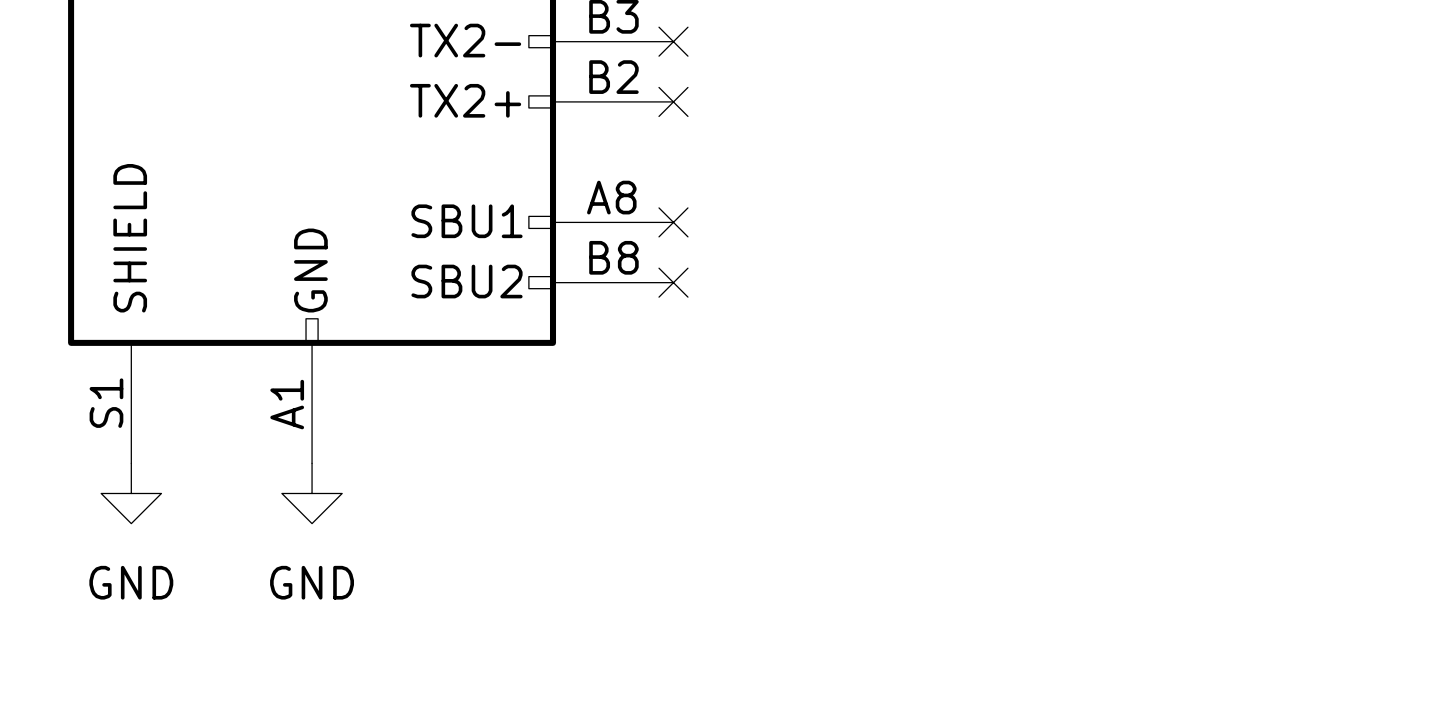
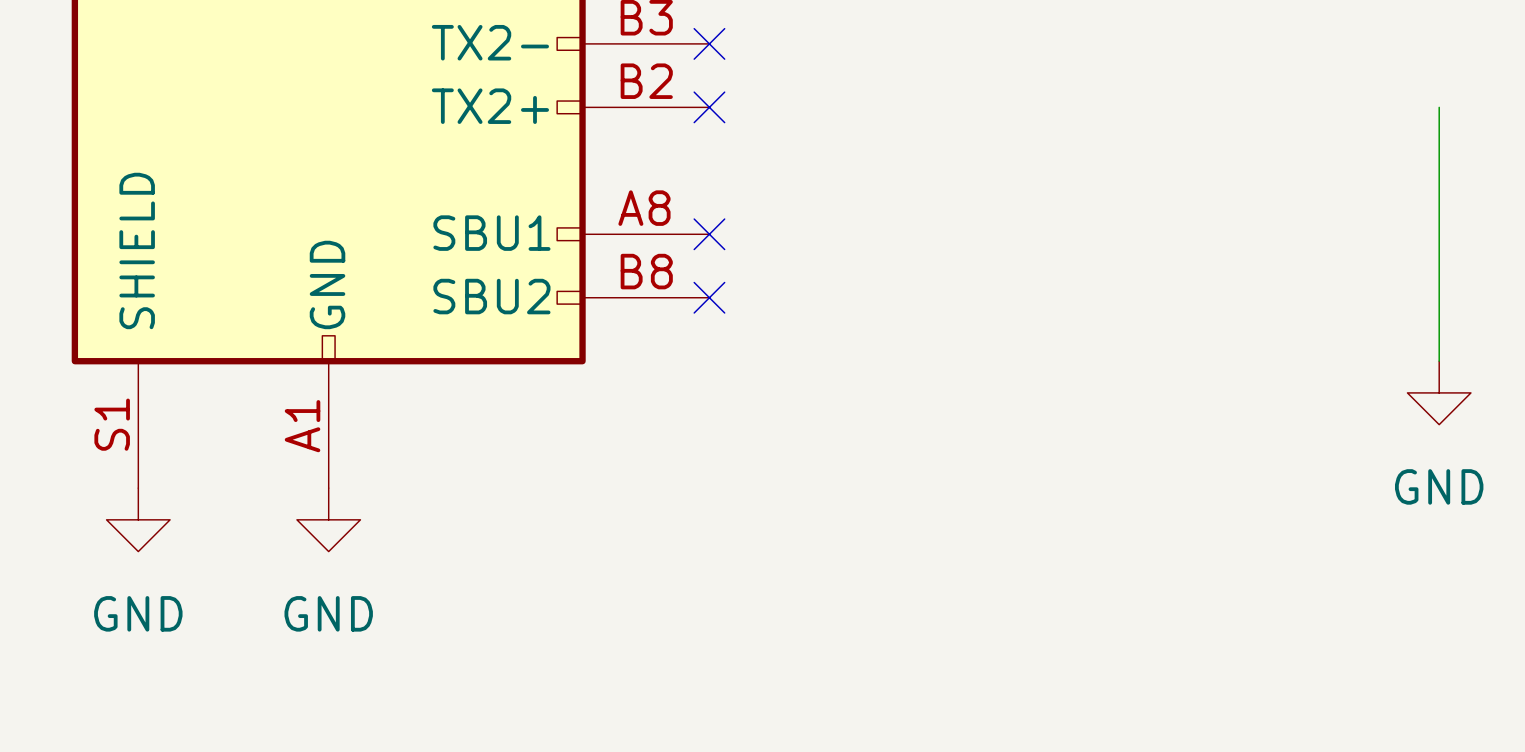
wire: none -> (1439, 107) (1439, 361)
power symbol: none -> GND (1439, 392)

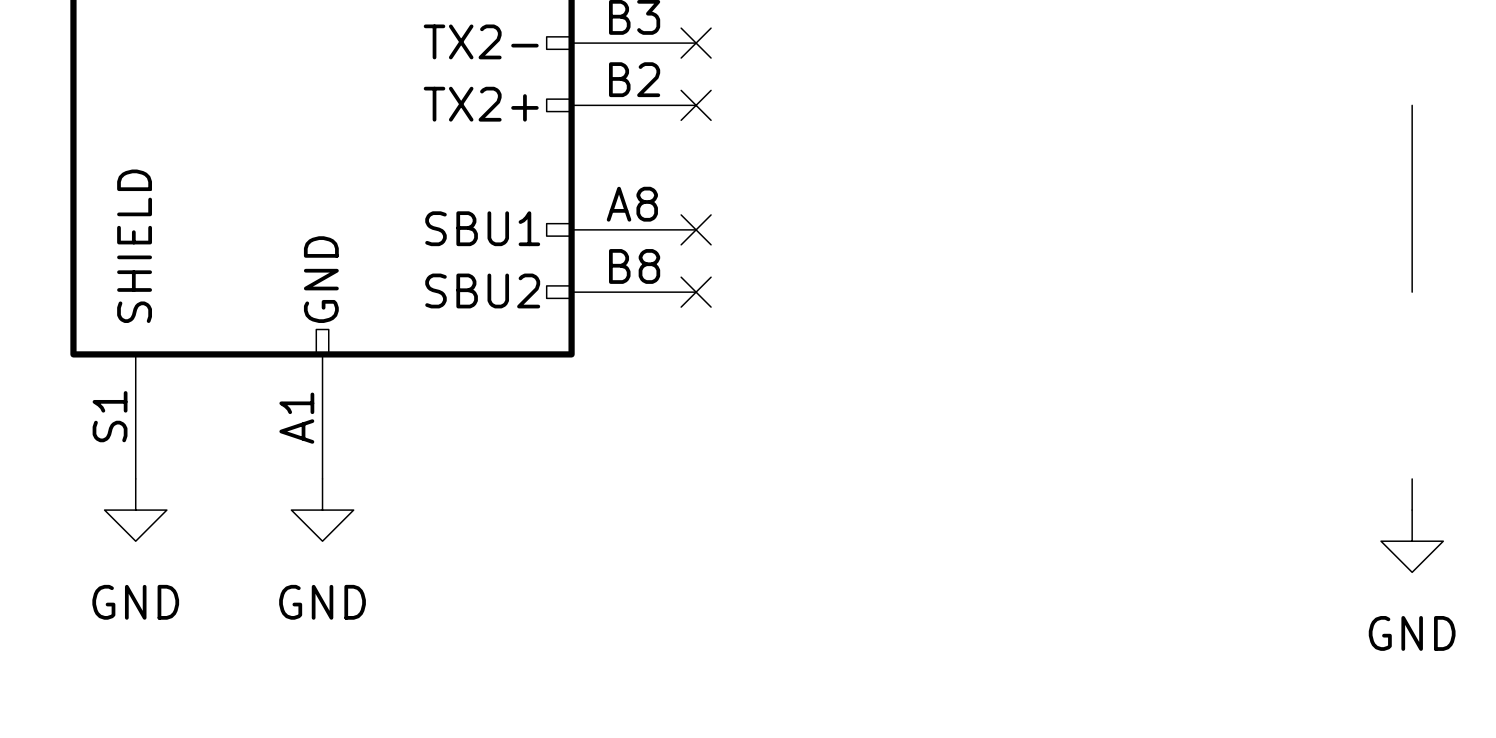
wire: (1439, 297) (1439, 361) -> none
power symbol: GND (1439, 392) -> none
wire: none -> (1412, 478) (1412, 510)
power symbol: none -> GND (1412, 541)

